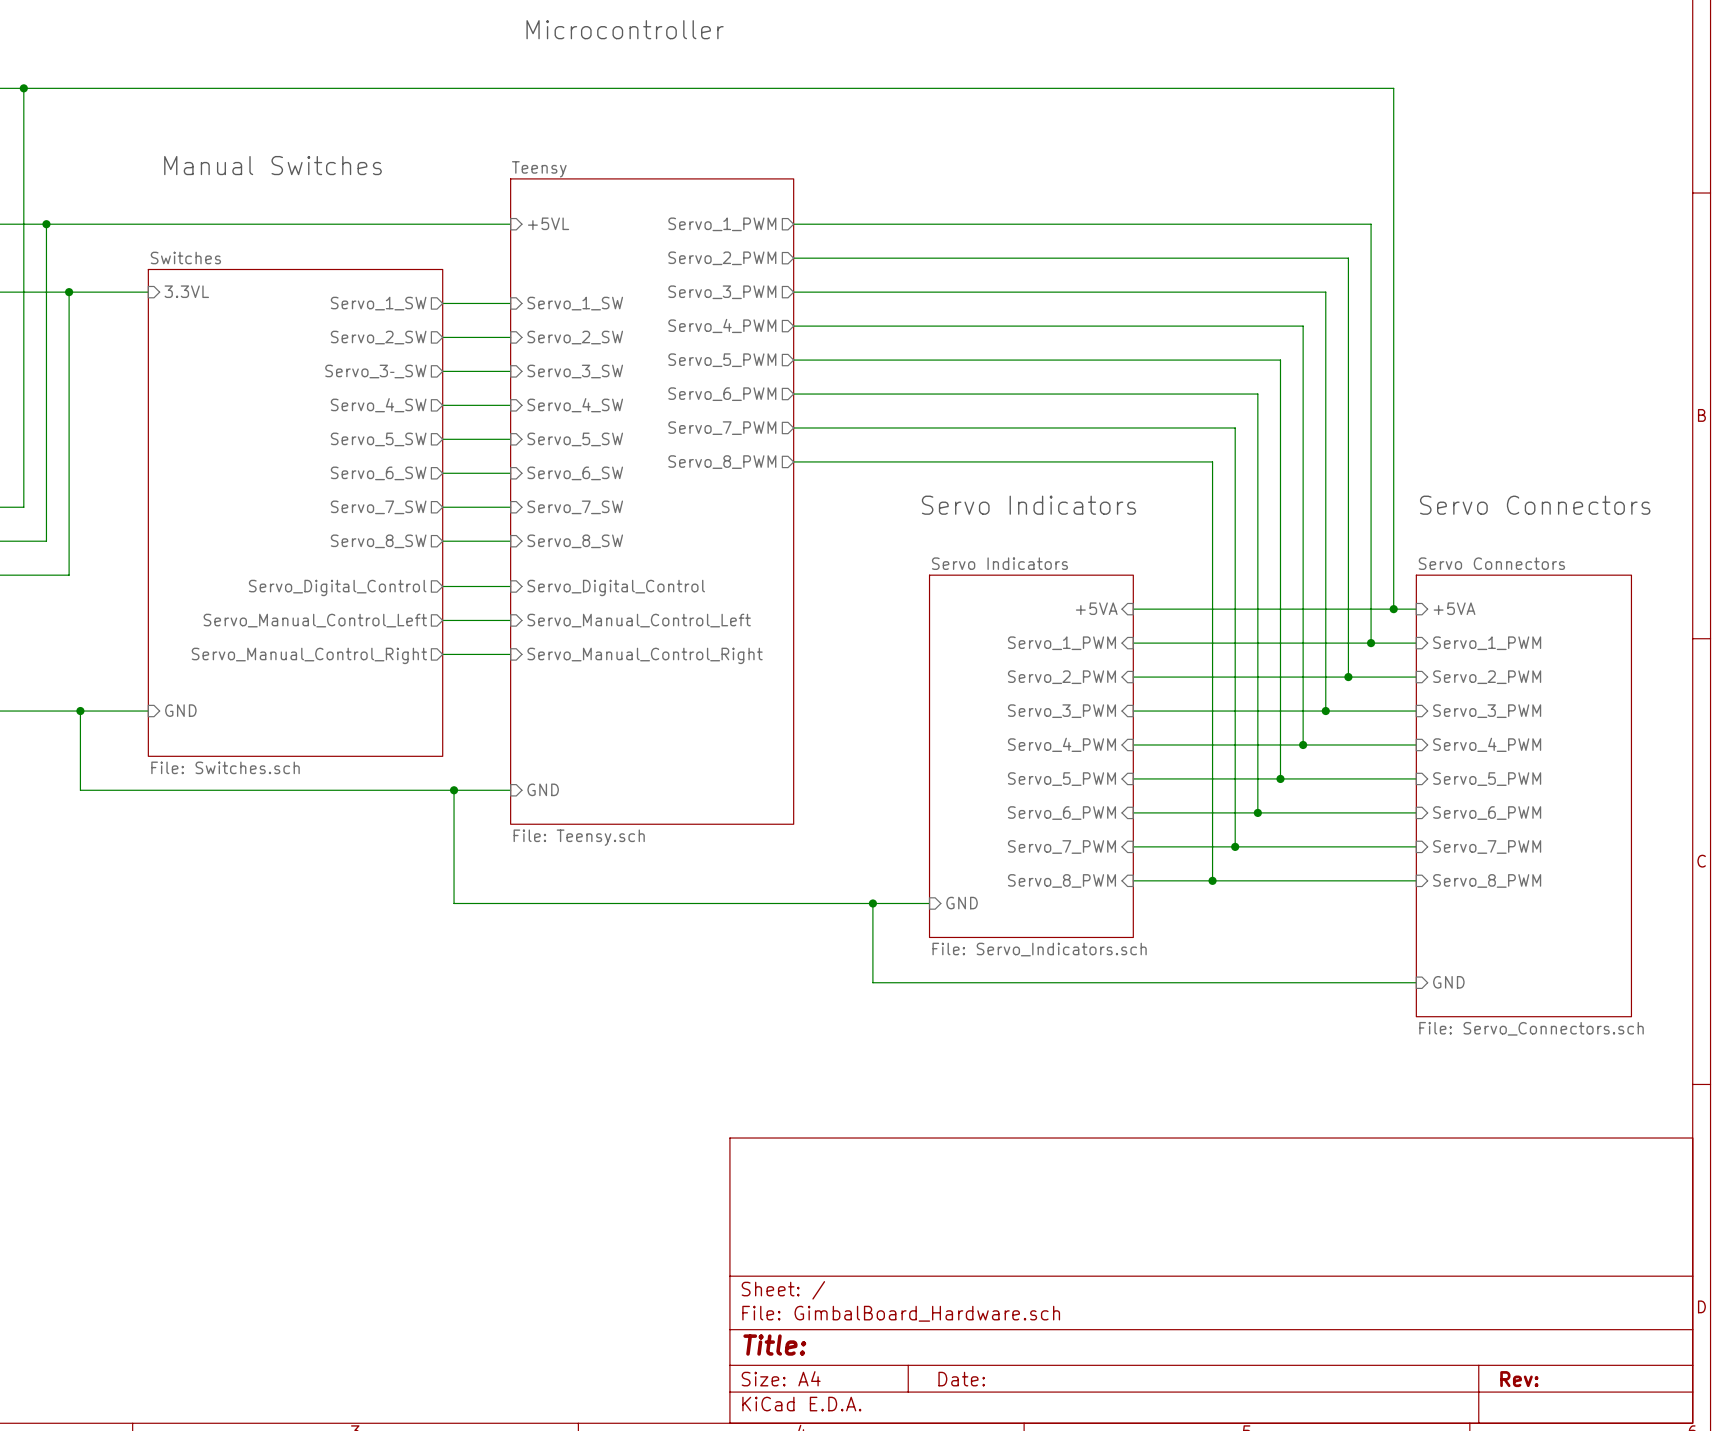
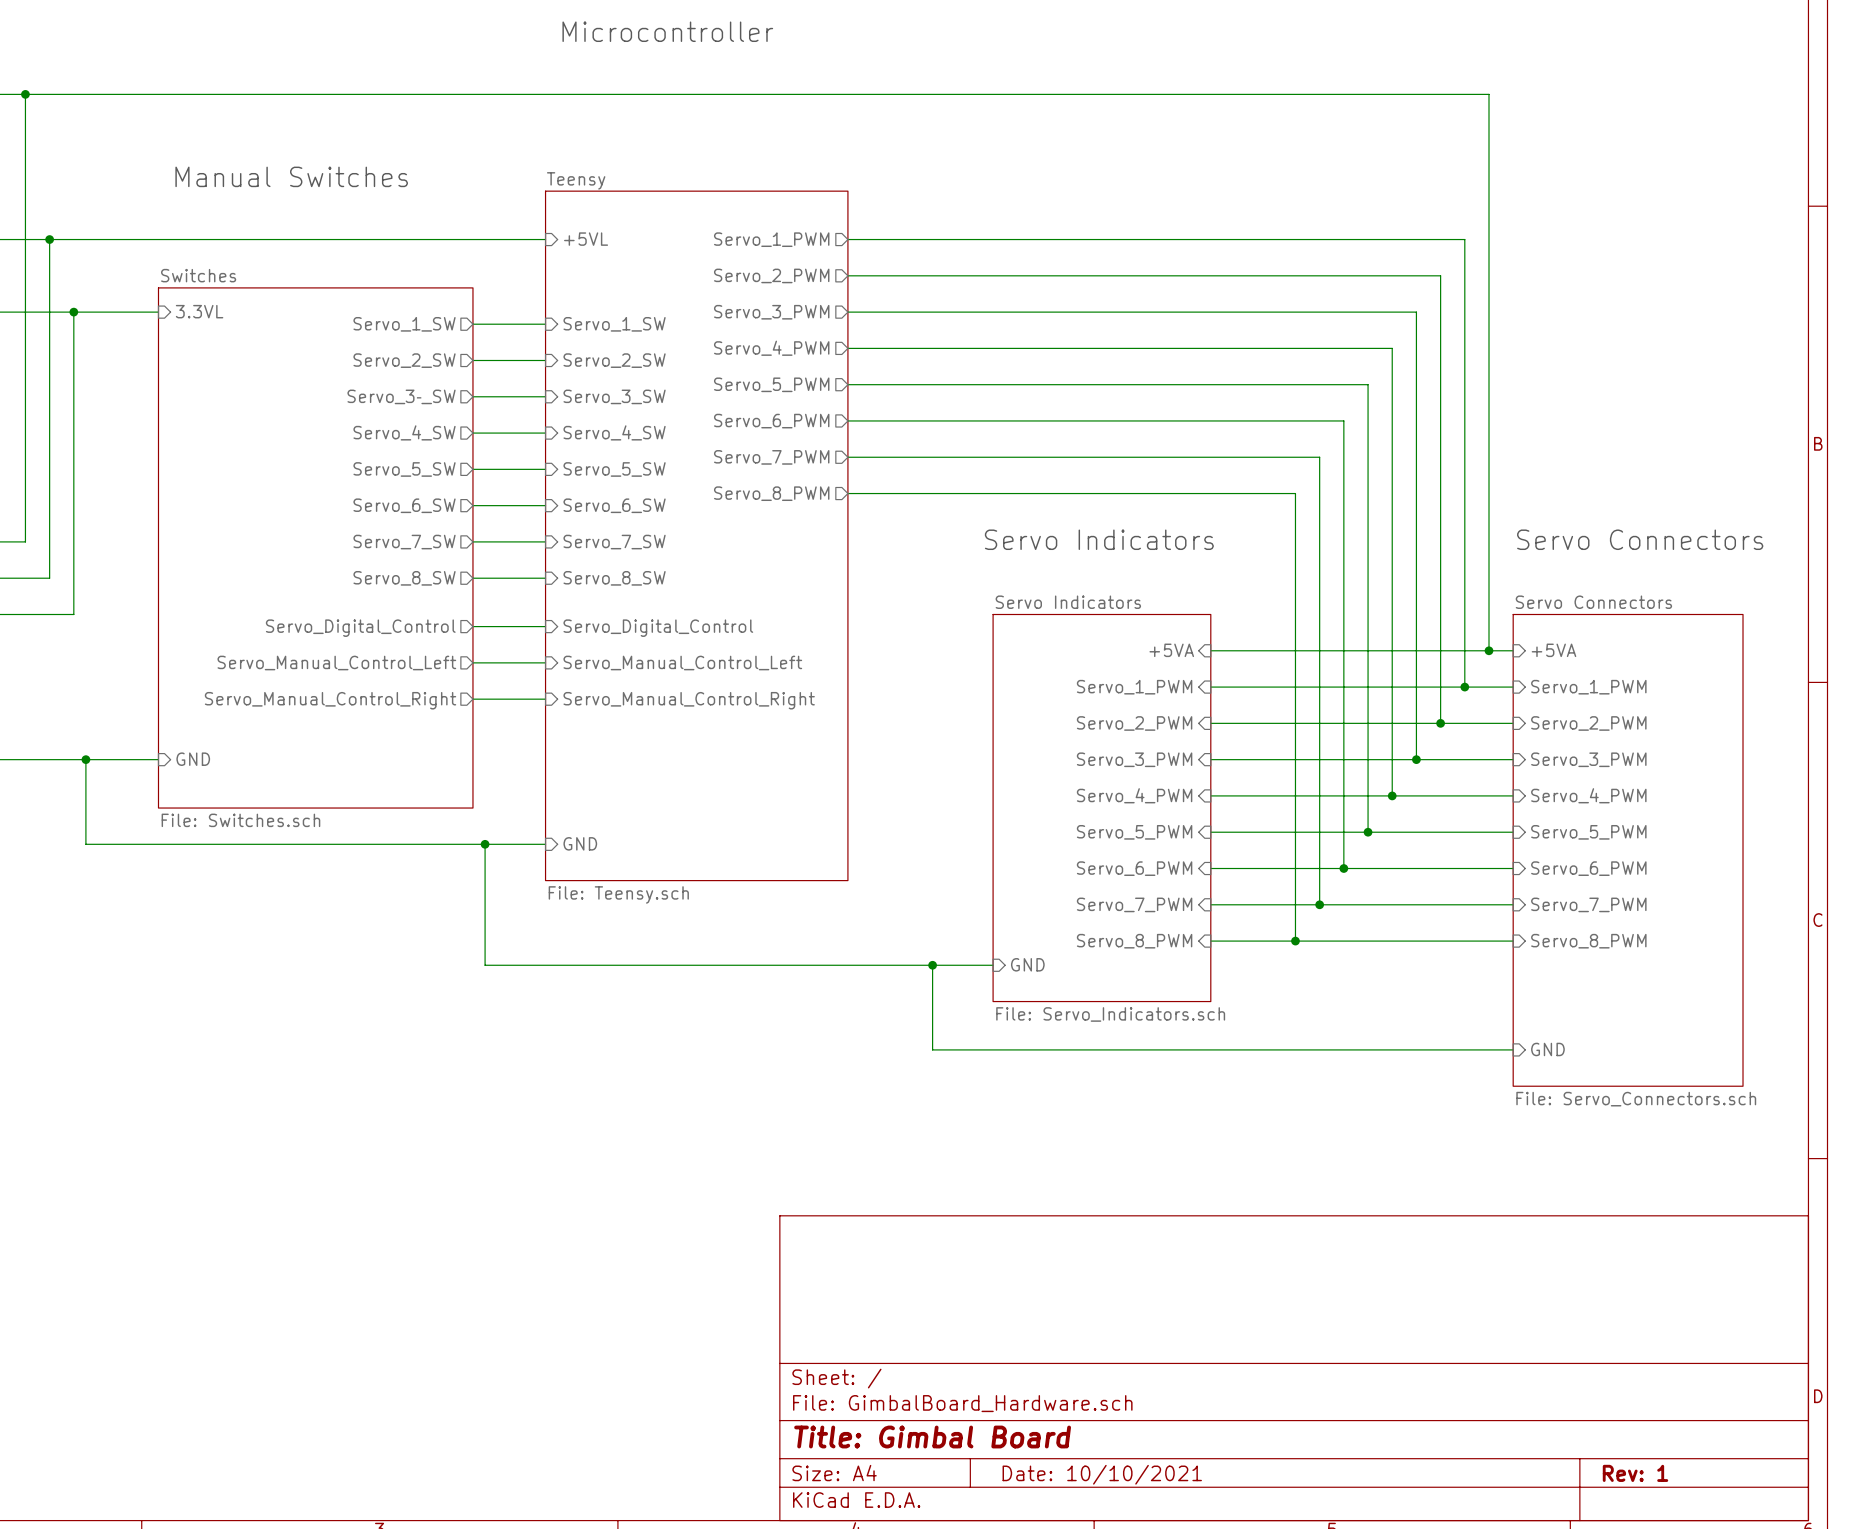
title block: Title: (774, 1345) -> Title: Gimbal Board (932, 1437)
title block: Date: (961, 1379) -> Date: 10/10/2021 (1102, 1474)
title block: Rev: (1519, 1379) -> Rev: 1 (1635, 1473)

